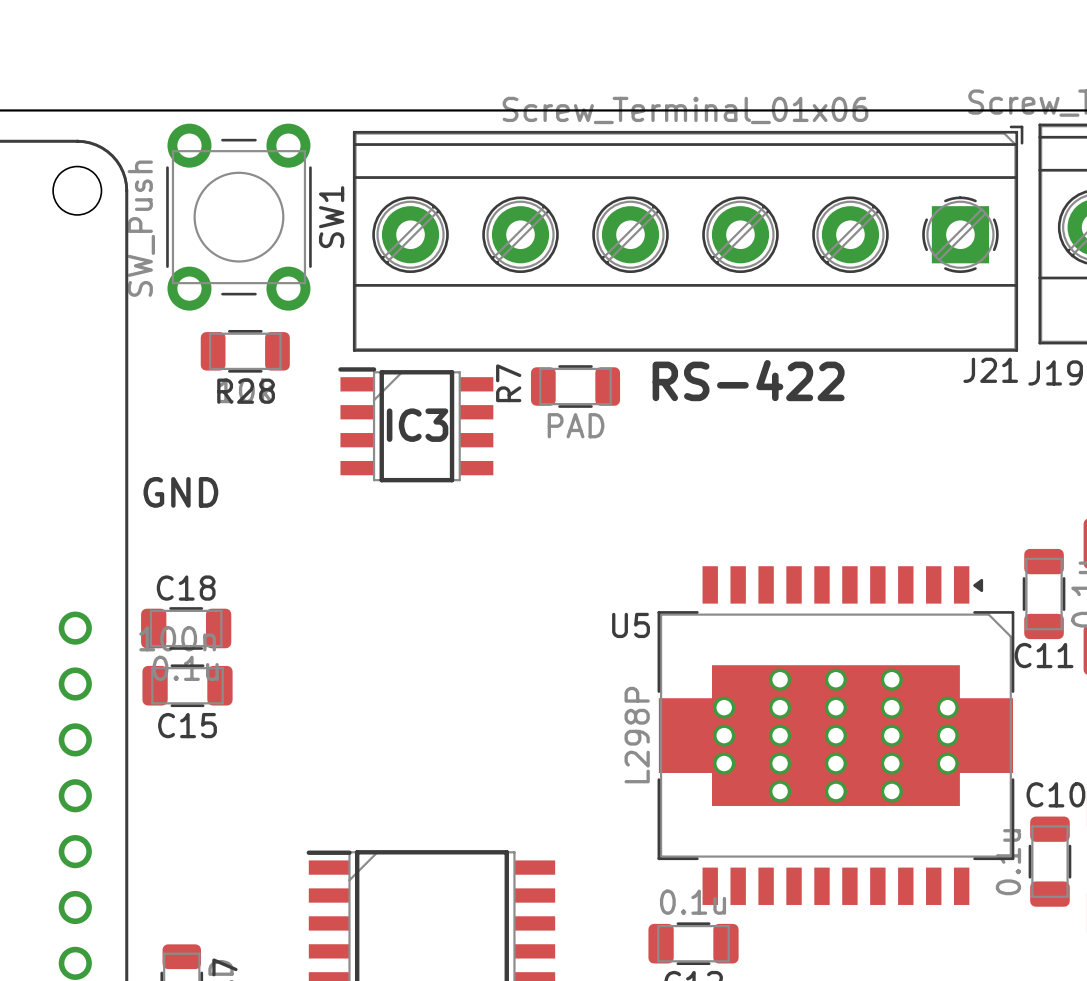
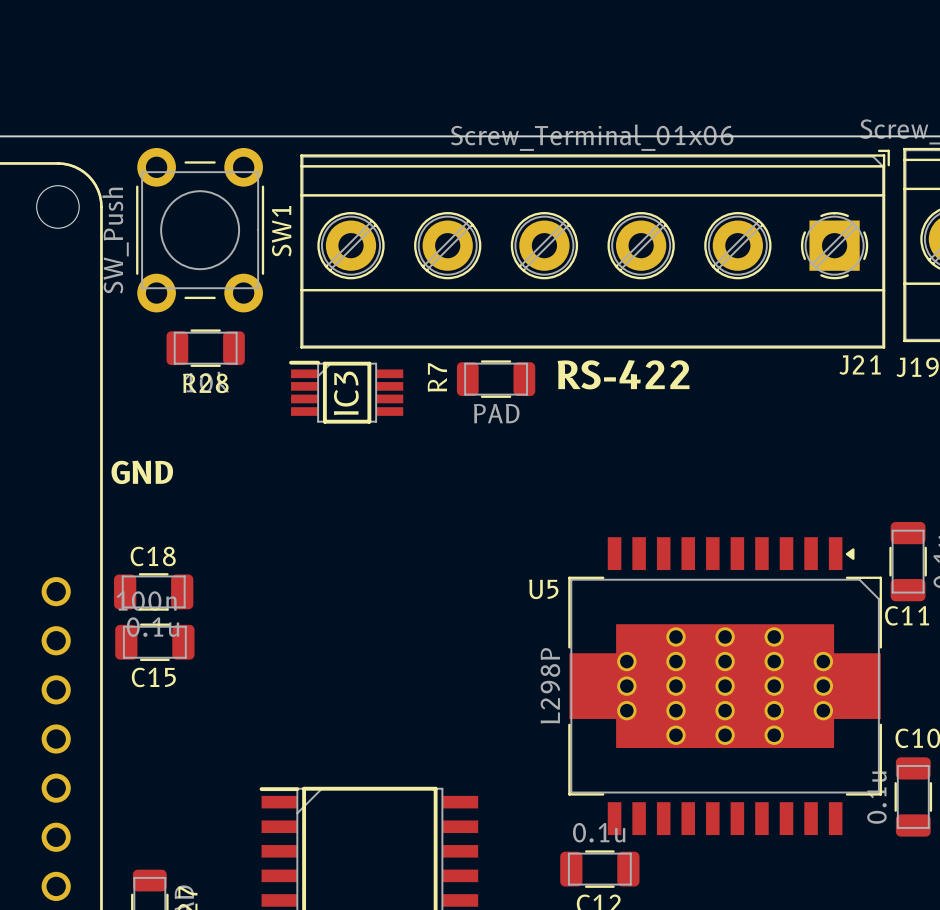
IC3 footprint: [338, 367, 494, 483] -> [289, 360, 404, 424]

